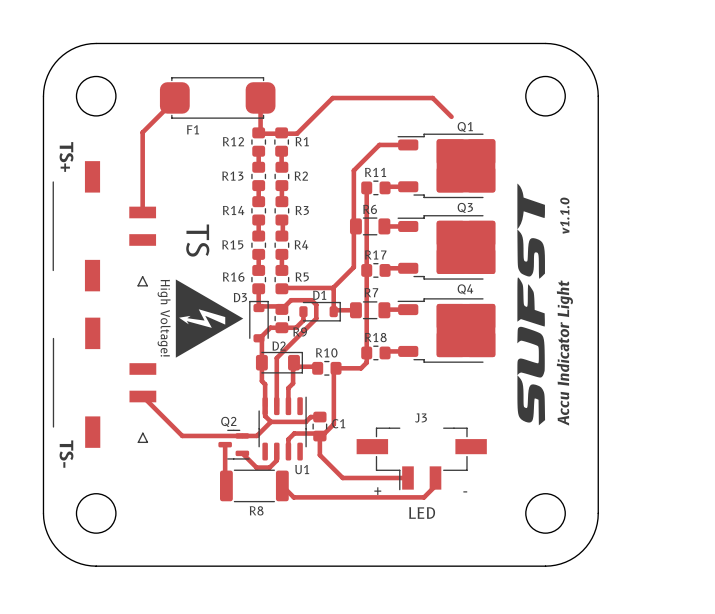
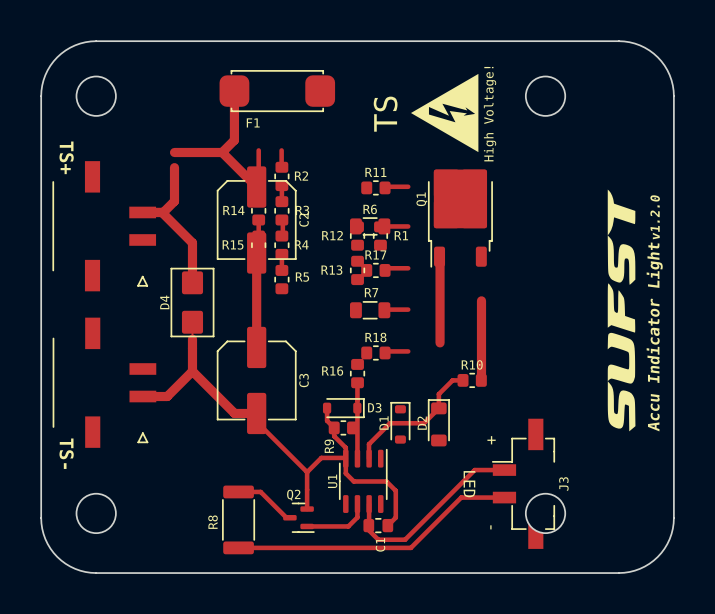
board edge: (96, 43) (545, 43) (565, 47) (582, 58) (594, 76) (598, 96) (598, 513) (594, 533) (582, 550) (565, 562) (545, 566) (96, 566) (76, 562) (58, 550) (47, 533) (43, 513) (43, 91) (49, 71) (58, 58) (76, 47) (96, 43) -> (96, 41) (80, 43) (61, 53) (47, 70) (41, 90) (41, 518) (45, 539) (57, 556) (75, 568) (96, 573) (618, 573) (639, 568) (657, 556) (669, 539) (673, 518) (673, 96) (669, 75) (657, 57) (639, 45) (618, 41) (96, 41)
drawing: none -> [411, 73, 479, 153]
track: none -> (234, 91) (234, 140) (222, 152)
track: (174, 97) (174, 100) (142, 132) (142, 212) -> (174, 167) (174, 201) (163, 212) (142, 212)
F1 position: (217, 97) -> (277, 91)
track: (260, 97) (260, 131) (258, 133) (297, 133) (332, 98) (432, 98) (451, 116) -> none
text: none -> High Voltage! (490, 114)
R12 position: (258, 142) -> (357, 236)
R1 position: (281, 142) -> (380, 236)
track: (408, 144) (379, 144) (353, 170) (353, 267) (333, 287) (281, 287) -> none
track: none -> (174, 152) (222, 152)
track: none -> (222, 152) (256, 186)
Q1 rotation: 0° (446, 165) -> 90° counterclockwise (460, 218)
R13 position: (258, 176) -> (357, 270)
track: (366, 187) (366, 362) (361, 368) (333, 368) (333, 424) (324, 433) (294, 433) (288, 439) (288, 451) -> none
track: none -> (162, 212) (192, 242) (192, 282)
text: v1.1.0 (564, 215) -> none
C2: none -> (256, 219)
text: none -> v1.2.0 (655, 217)
text rotation: 0° (197, 240) -> 180° (385, 114)
text position: TS (197, 240) -> TS (385, 114)
Q3: (446, 247) -> none
track: none -> (256, 253) (256, 347)
track: none -> (440, 257) (440, 342)
drawing: [175, 279, 244, 358] -> none
R16 position: (258, 279) -> (357, 373)
track: (258, 287) (258, 308) (260, 306) (284, 306) (291, 300) (311, 300) (316, 304) (316, 318) (276, 358) (276, 406) -> none
track: (333, 287) (333, 311) (355, 310) -> none
D3 name position: D3 (240, 297) -> D3 (374, 407)
track: none -> (481, 300) (481, 380)
D4: none -> (192, 302)
drawing position: (531, 304) -> (621, 310)
track: (303, 311) (303, 320) (296, 327) (270, 327) (261, 336) (261, 381) (265, 384) (265, 416) (270, 421) -> none
D1 rotation: 0° (320, 311) -> 90° counterclockwise (400, 422)
D1 position: (320, 311) -> (400, 422)
text: High Voltage! (164, 318) -> none
R9 rotation: 0° (281, 318) -> 90° clockwise (343, 427)
R9 position: (281, 318) -> (343, 427)
D3 rotation: 0° (258, 321) -> 90° clockwise (343, 408)
D3 position: (258, 321) -> (343, 408)
track: none -> (192, 322) (192, 371)
Q4: (446, 330) -> none
text position: Accu Indicator Light (564, 352) -> Accu Indicator Light (654, 336)
D2 rotation: 0° (279, 362) -> 90° counterclockwise (438, 422)
D2 position: (279, 362) -> (438, 422)
track: (314, 368) (296, 366) (293, 370) (293, 383) (288, 388) (288, 406) -> none
R10 position: (326, 368) -> (472, 380)
track: none -> (192, 371) (234, 413) (256, 413) (256, 421) (307, 472)
C3: none -> (256, 380)
track: none -> (463, 380) (452, 380) (438, 394) (438, 408) (423, 423) (389, 423) (369, 444) (369, 458)
track: none -> (357, 382) (357, 458)
track: (142, 396) (182, 435) (256, 435) (270, 421) -> (142, 396) (167, 396) (192, 371)
track: none -> (327, 408) (327, 420) (334, 427) (334, 436) (345, 447) (345, 473) (353, 481) (386, 481) (395, 490) (395, 517) (387, 525)
track: (319, 417) (310, 417) (305, 421) (270, 421) -> none
C1 rotation: 0° (319, 426) -> 90° clockwise (378, 525)
C1 position: (319, 426) -> (378, 525)
U1 position: (282, 428) -> (363, 481)
track: (319, 436) (319, 455) (342, 477) (407, 477) -> none
track: (225, 444) (226, 485) -> none
Q2 position: (234, 444) -> (298, 517)
track: (276, 451) (276, 460) (269, 467) (256, 467) (242, 453) -> none
track: none -> (345, 457) (321, 457) (307, 472)
J3 rotation: 0° (421, 458) -> 90° clockwise (523, 483)
J3 position: (421, 458) -> (523, 483)
U1 name rotation: 0° (302, 469) -> 90° counterclockwise (332, 481)
U1 name position: U1 (302, 469) -> U1 (332, 481)
track: none -> (504, 470) (474, 470) (405, 539) (378, 539) (368, 530) (369, 504)
track: none -> (307, 472) (307, 509)
track: (435, 477) (435, 485) (424, 497) (293, 497) (282, 485) -> none
R8 rotation: 0° (254, 485) -> 90° clockwise (238, 519)
track: none -> (238, 491) (260, 491) (286, 517) (289, 517)
text rotation: 0° (377, 491) -> 90° clockwise (491, 440)
text position: + (377, 491) -> + (491, 440)
text rotation: 0° (465, 491) -> 90° clockwise (490, 527)
text position: - (465, 491) -> - (490, 527)
track: none -> (504, 497) (461, 497) (410, 547) (238, 547)
track: none -> (357, 512) (357, 517) (348, 526) (307, 526)
text rotation: 0° (422, 513) -> 90° clockwise (469, 484)
text position: LED (422, 513) -> LED (469, 484)

